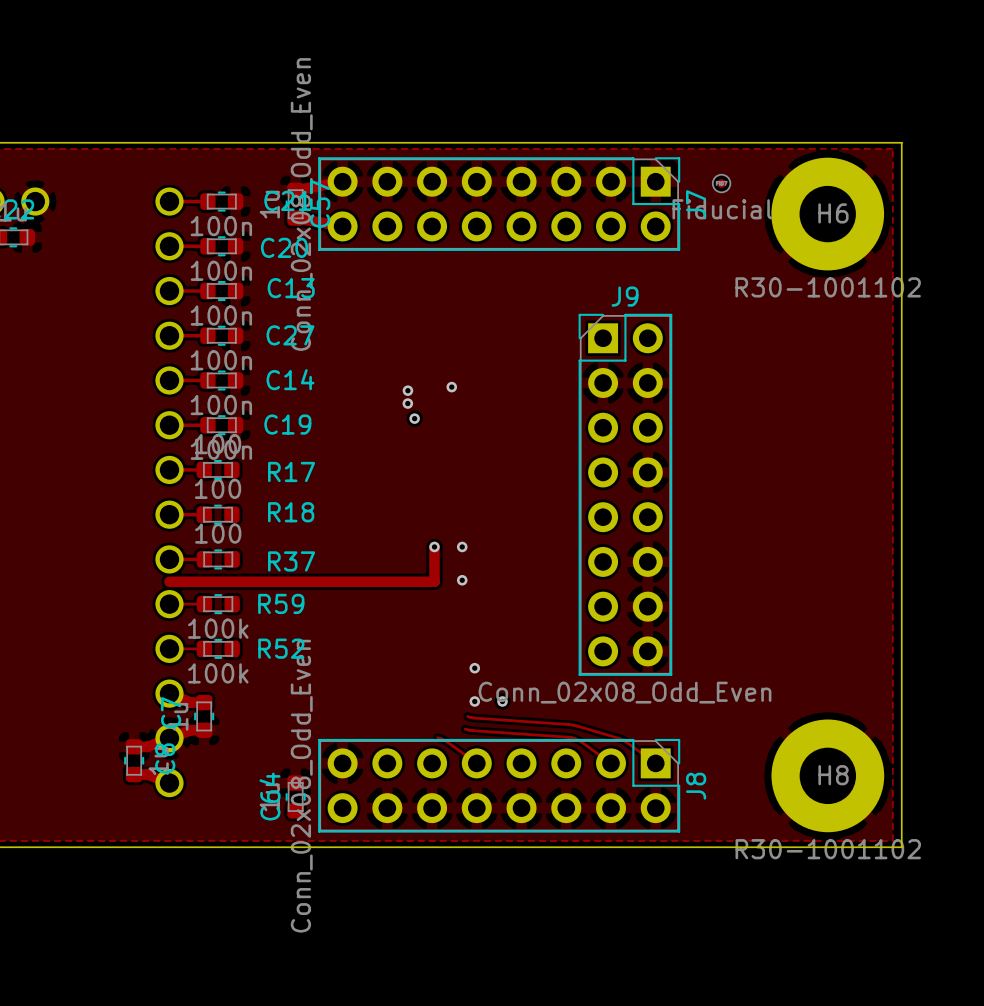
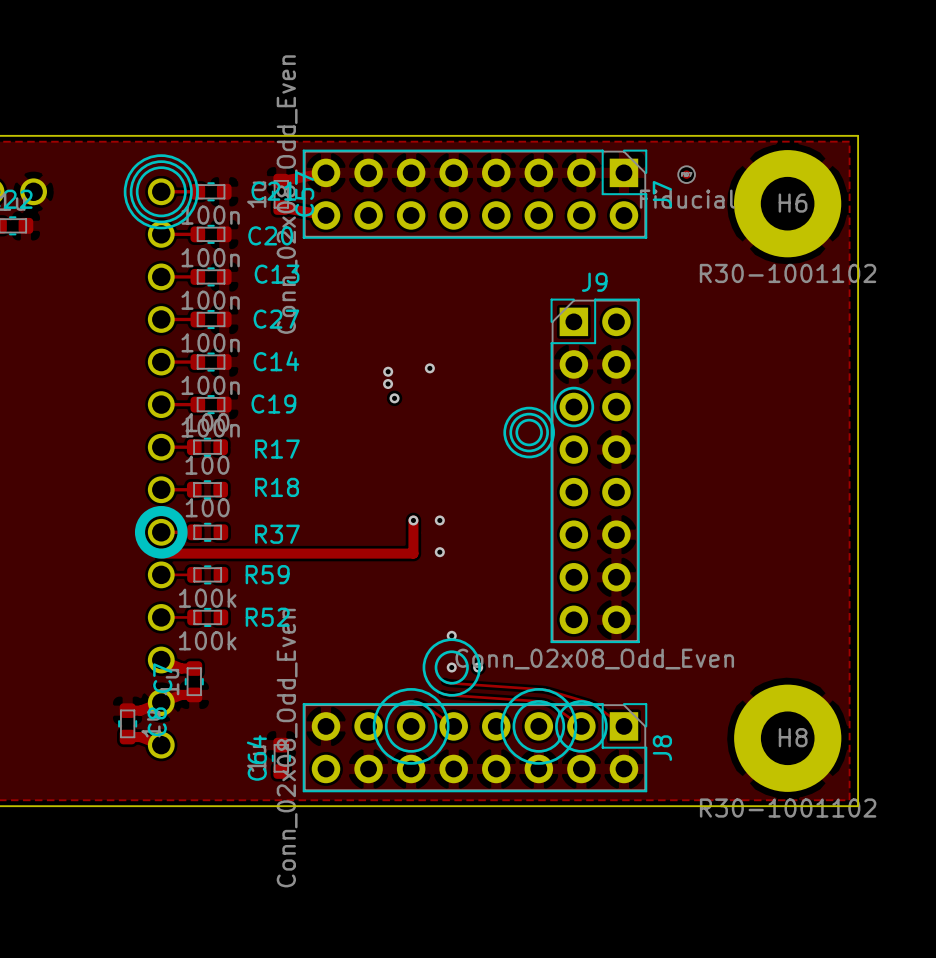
drawing: none -> [123, 154, 199, 230]
drawing: none -> [503, 386, 595, 459]
drawing: none -> [134, 506, 188, 559]
drawing: none -> [372, 638, 608, 765]

